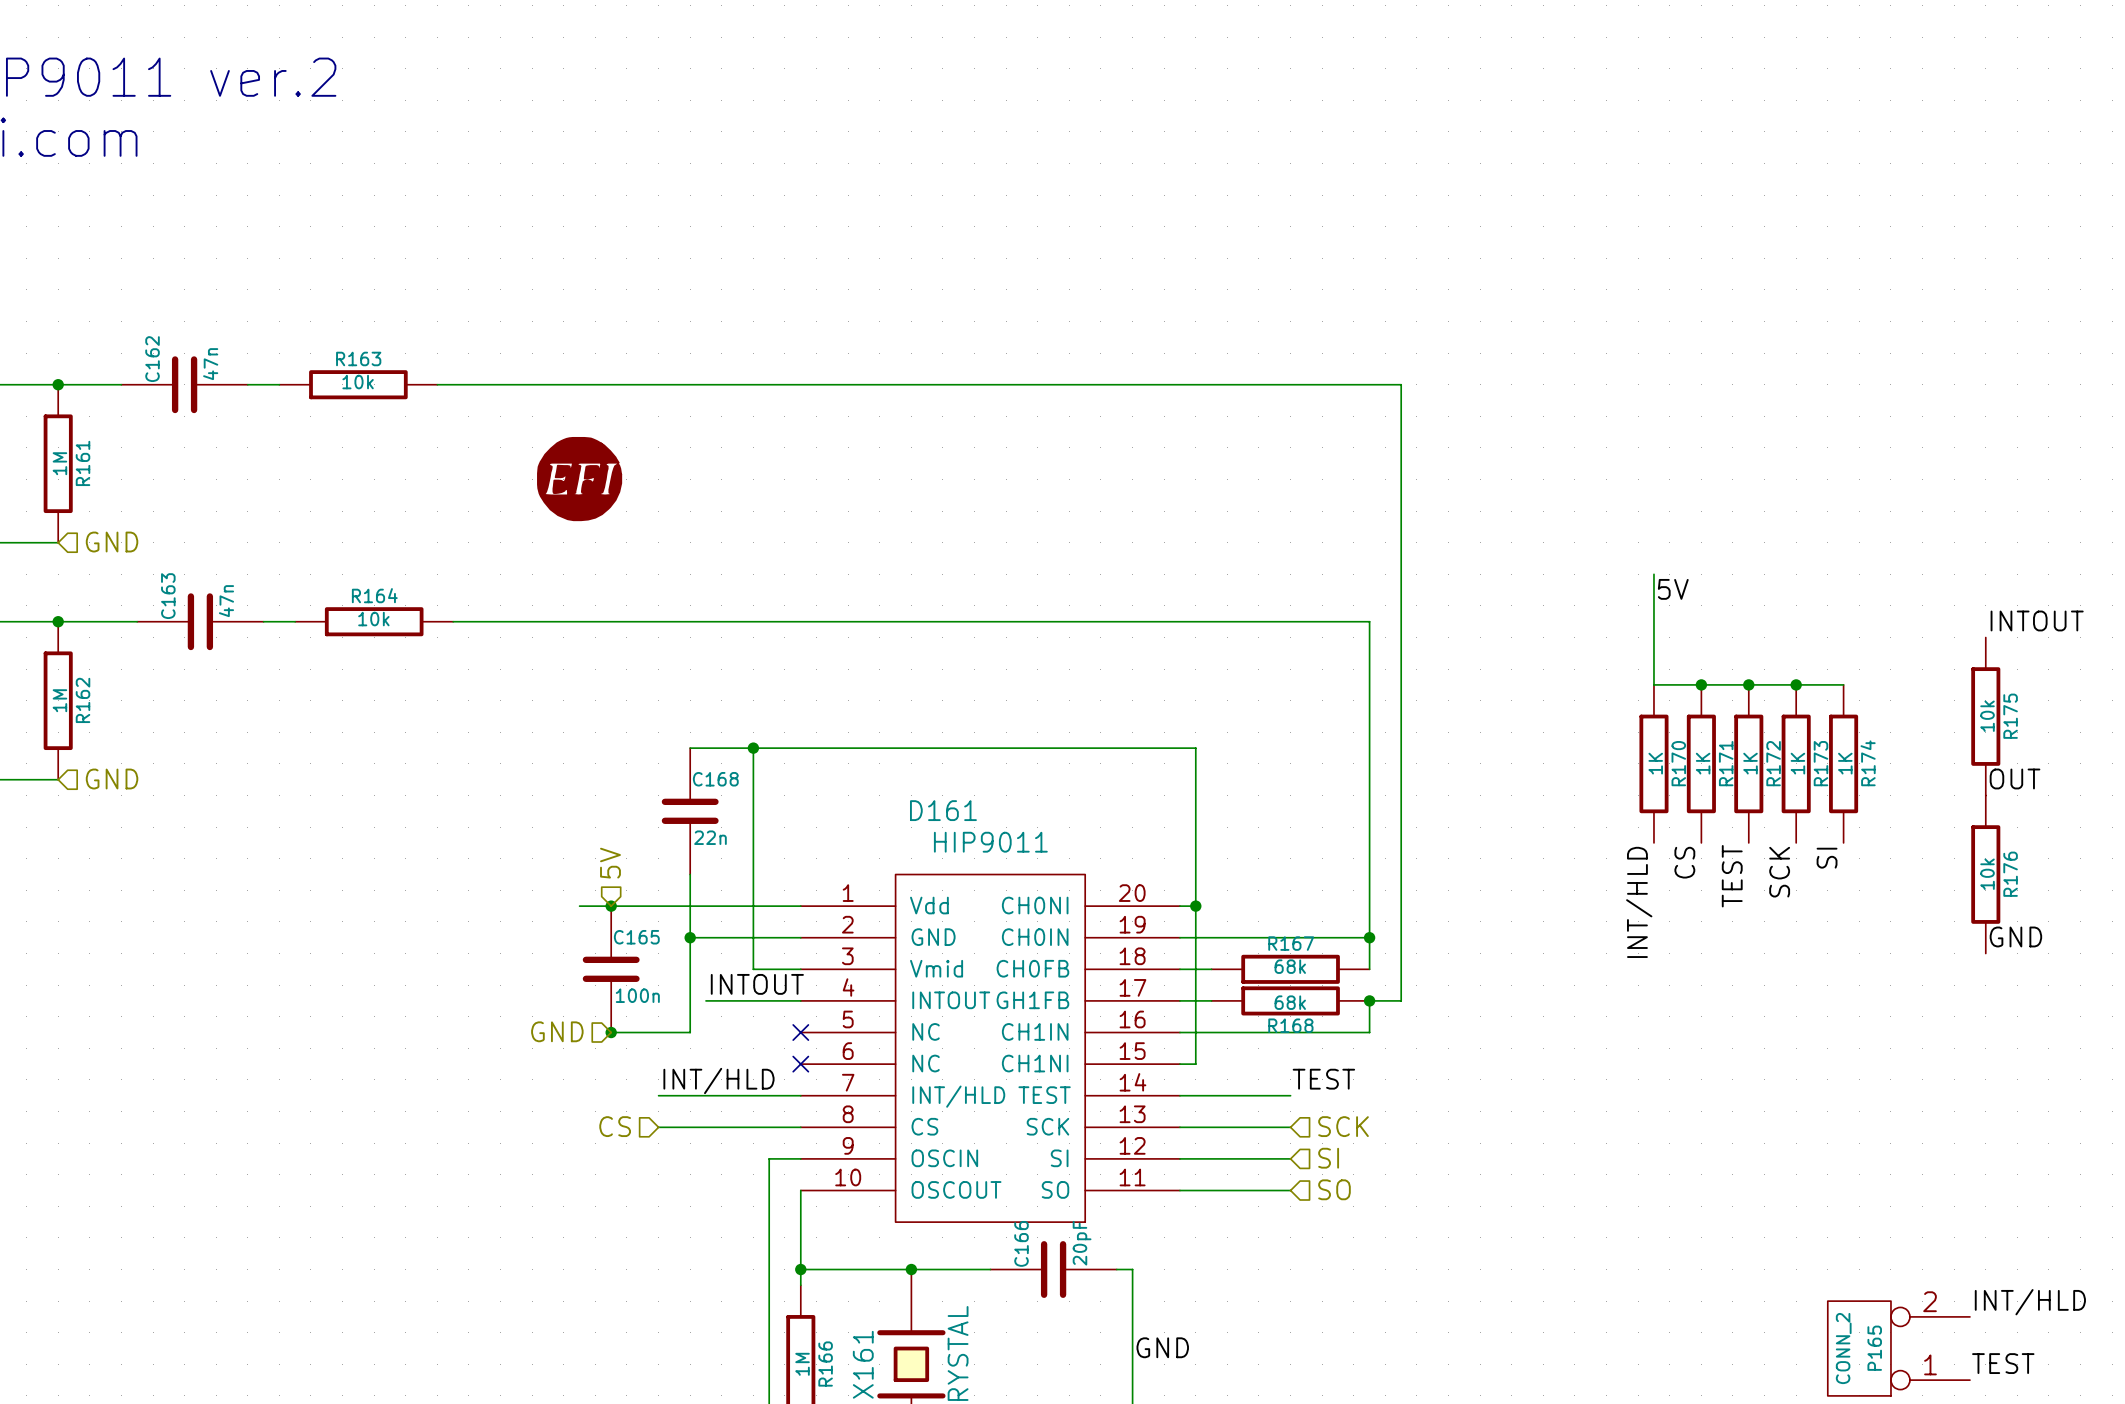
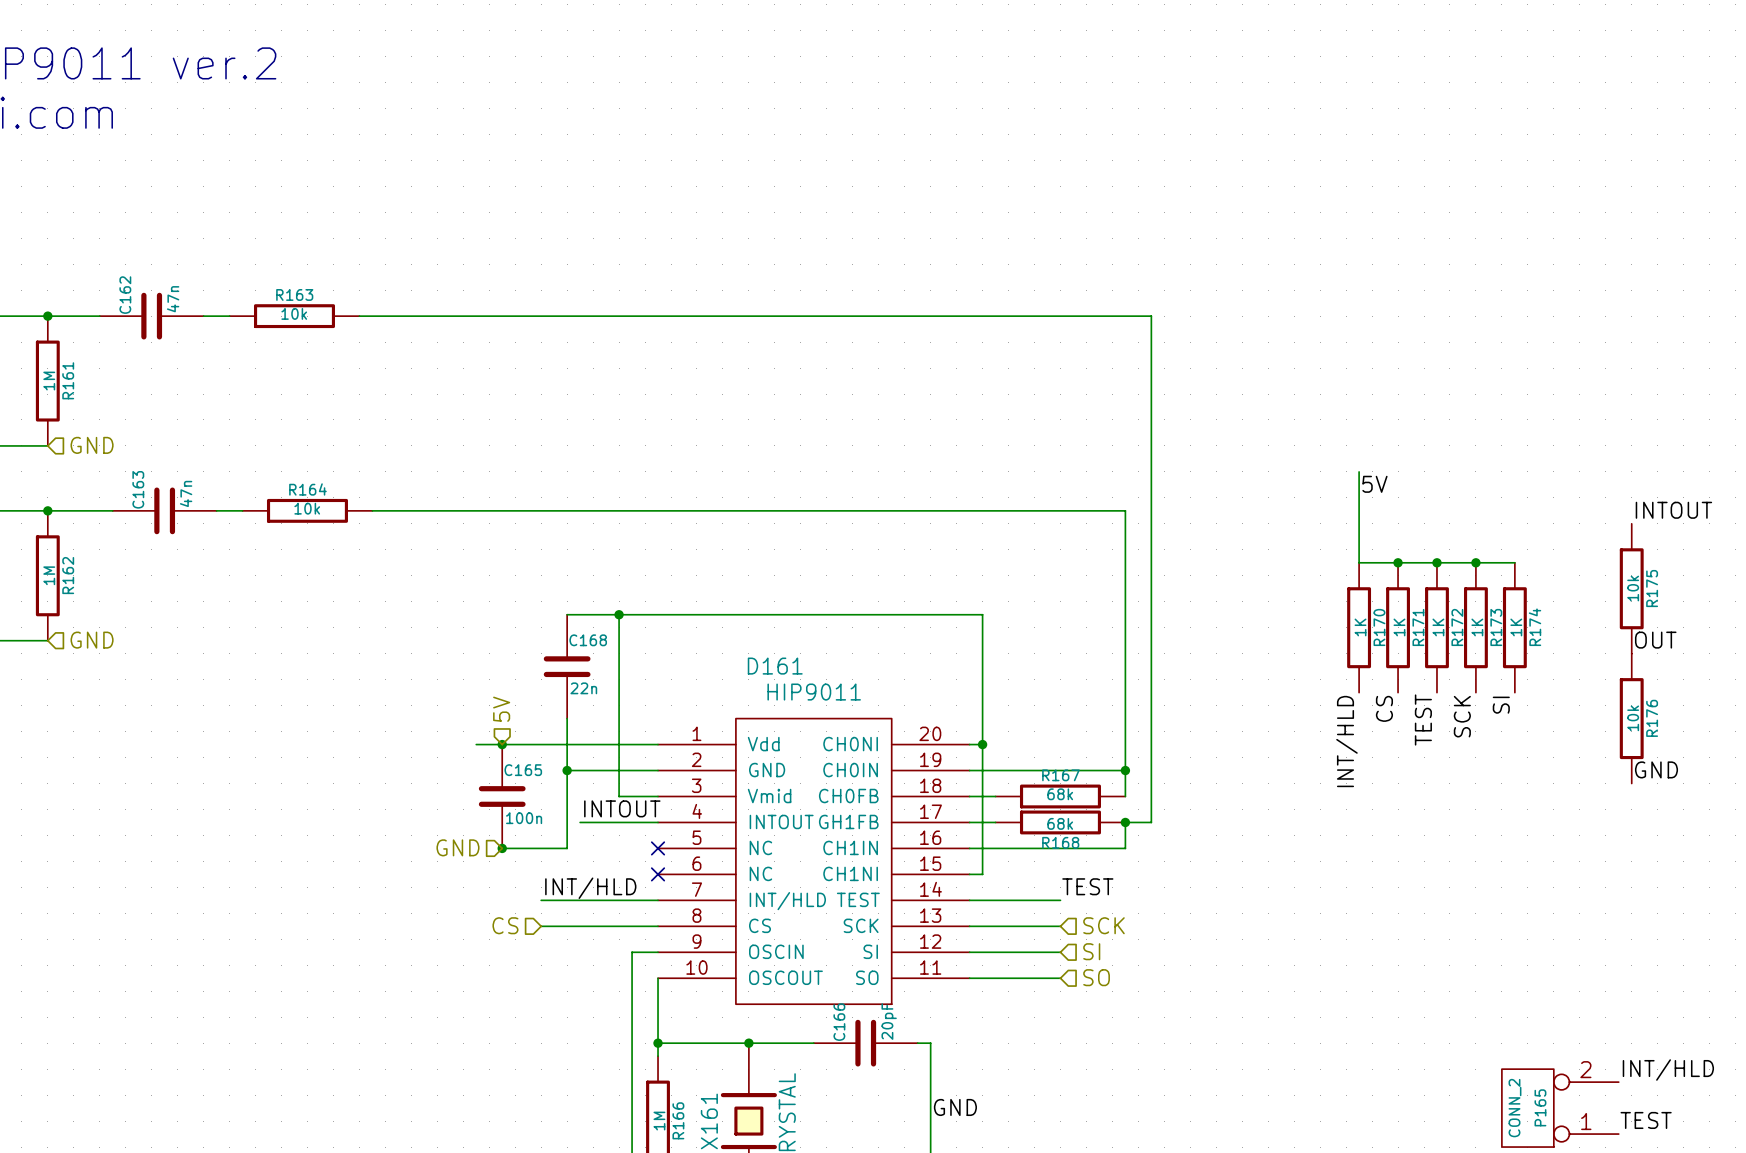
part: (579, 479) -> none

